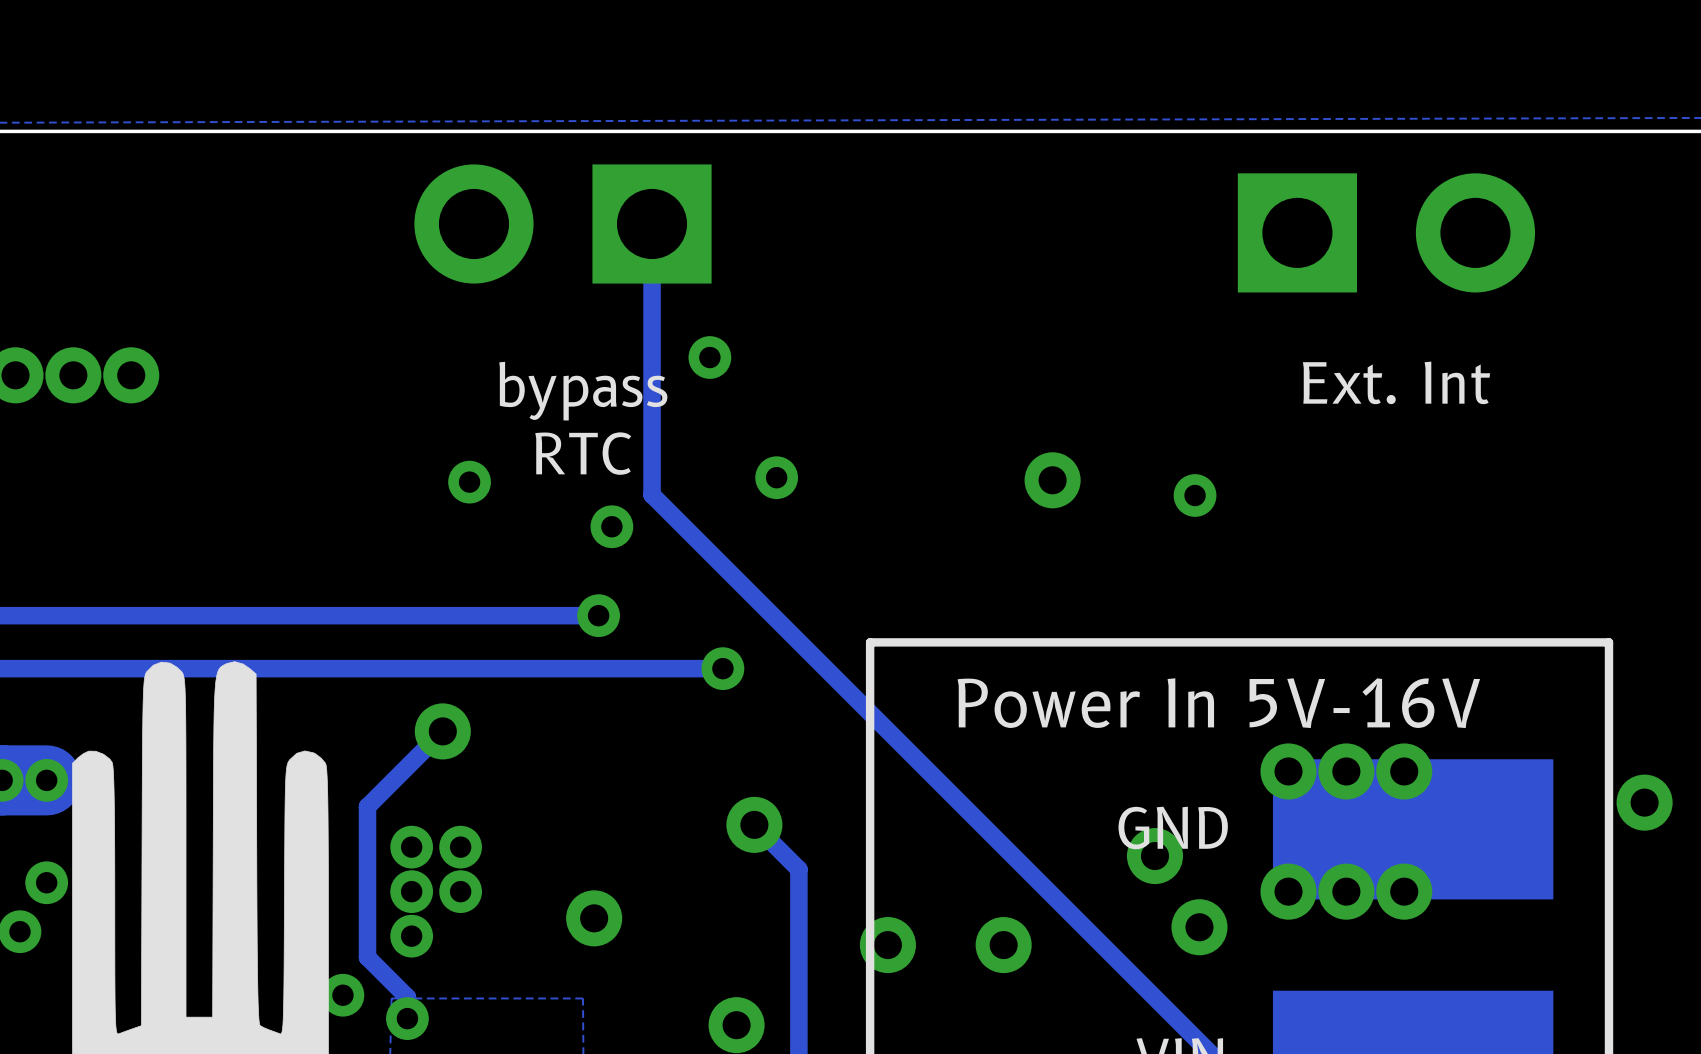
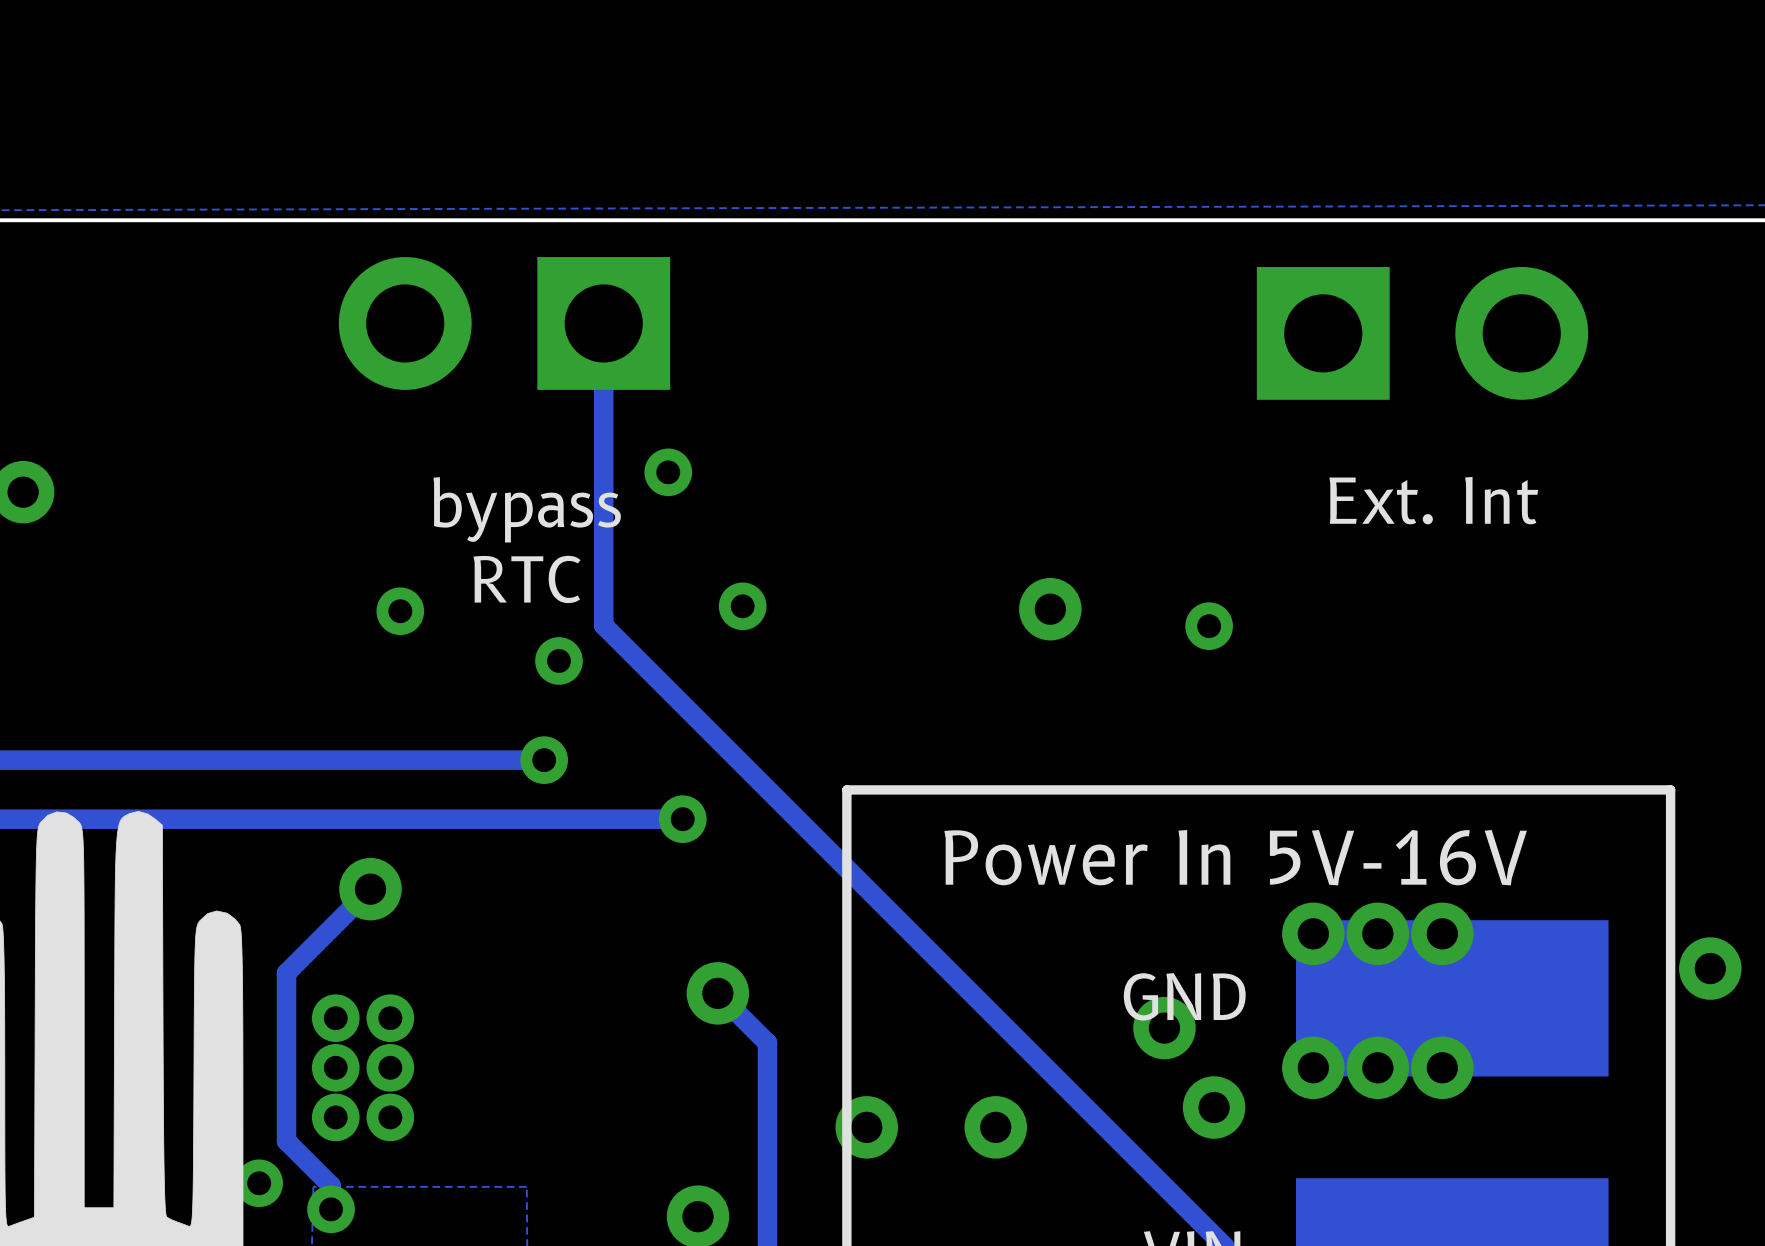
via: (594, 918) -> none
via: none -> (390, 1117)

